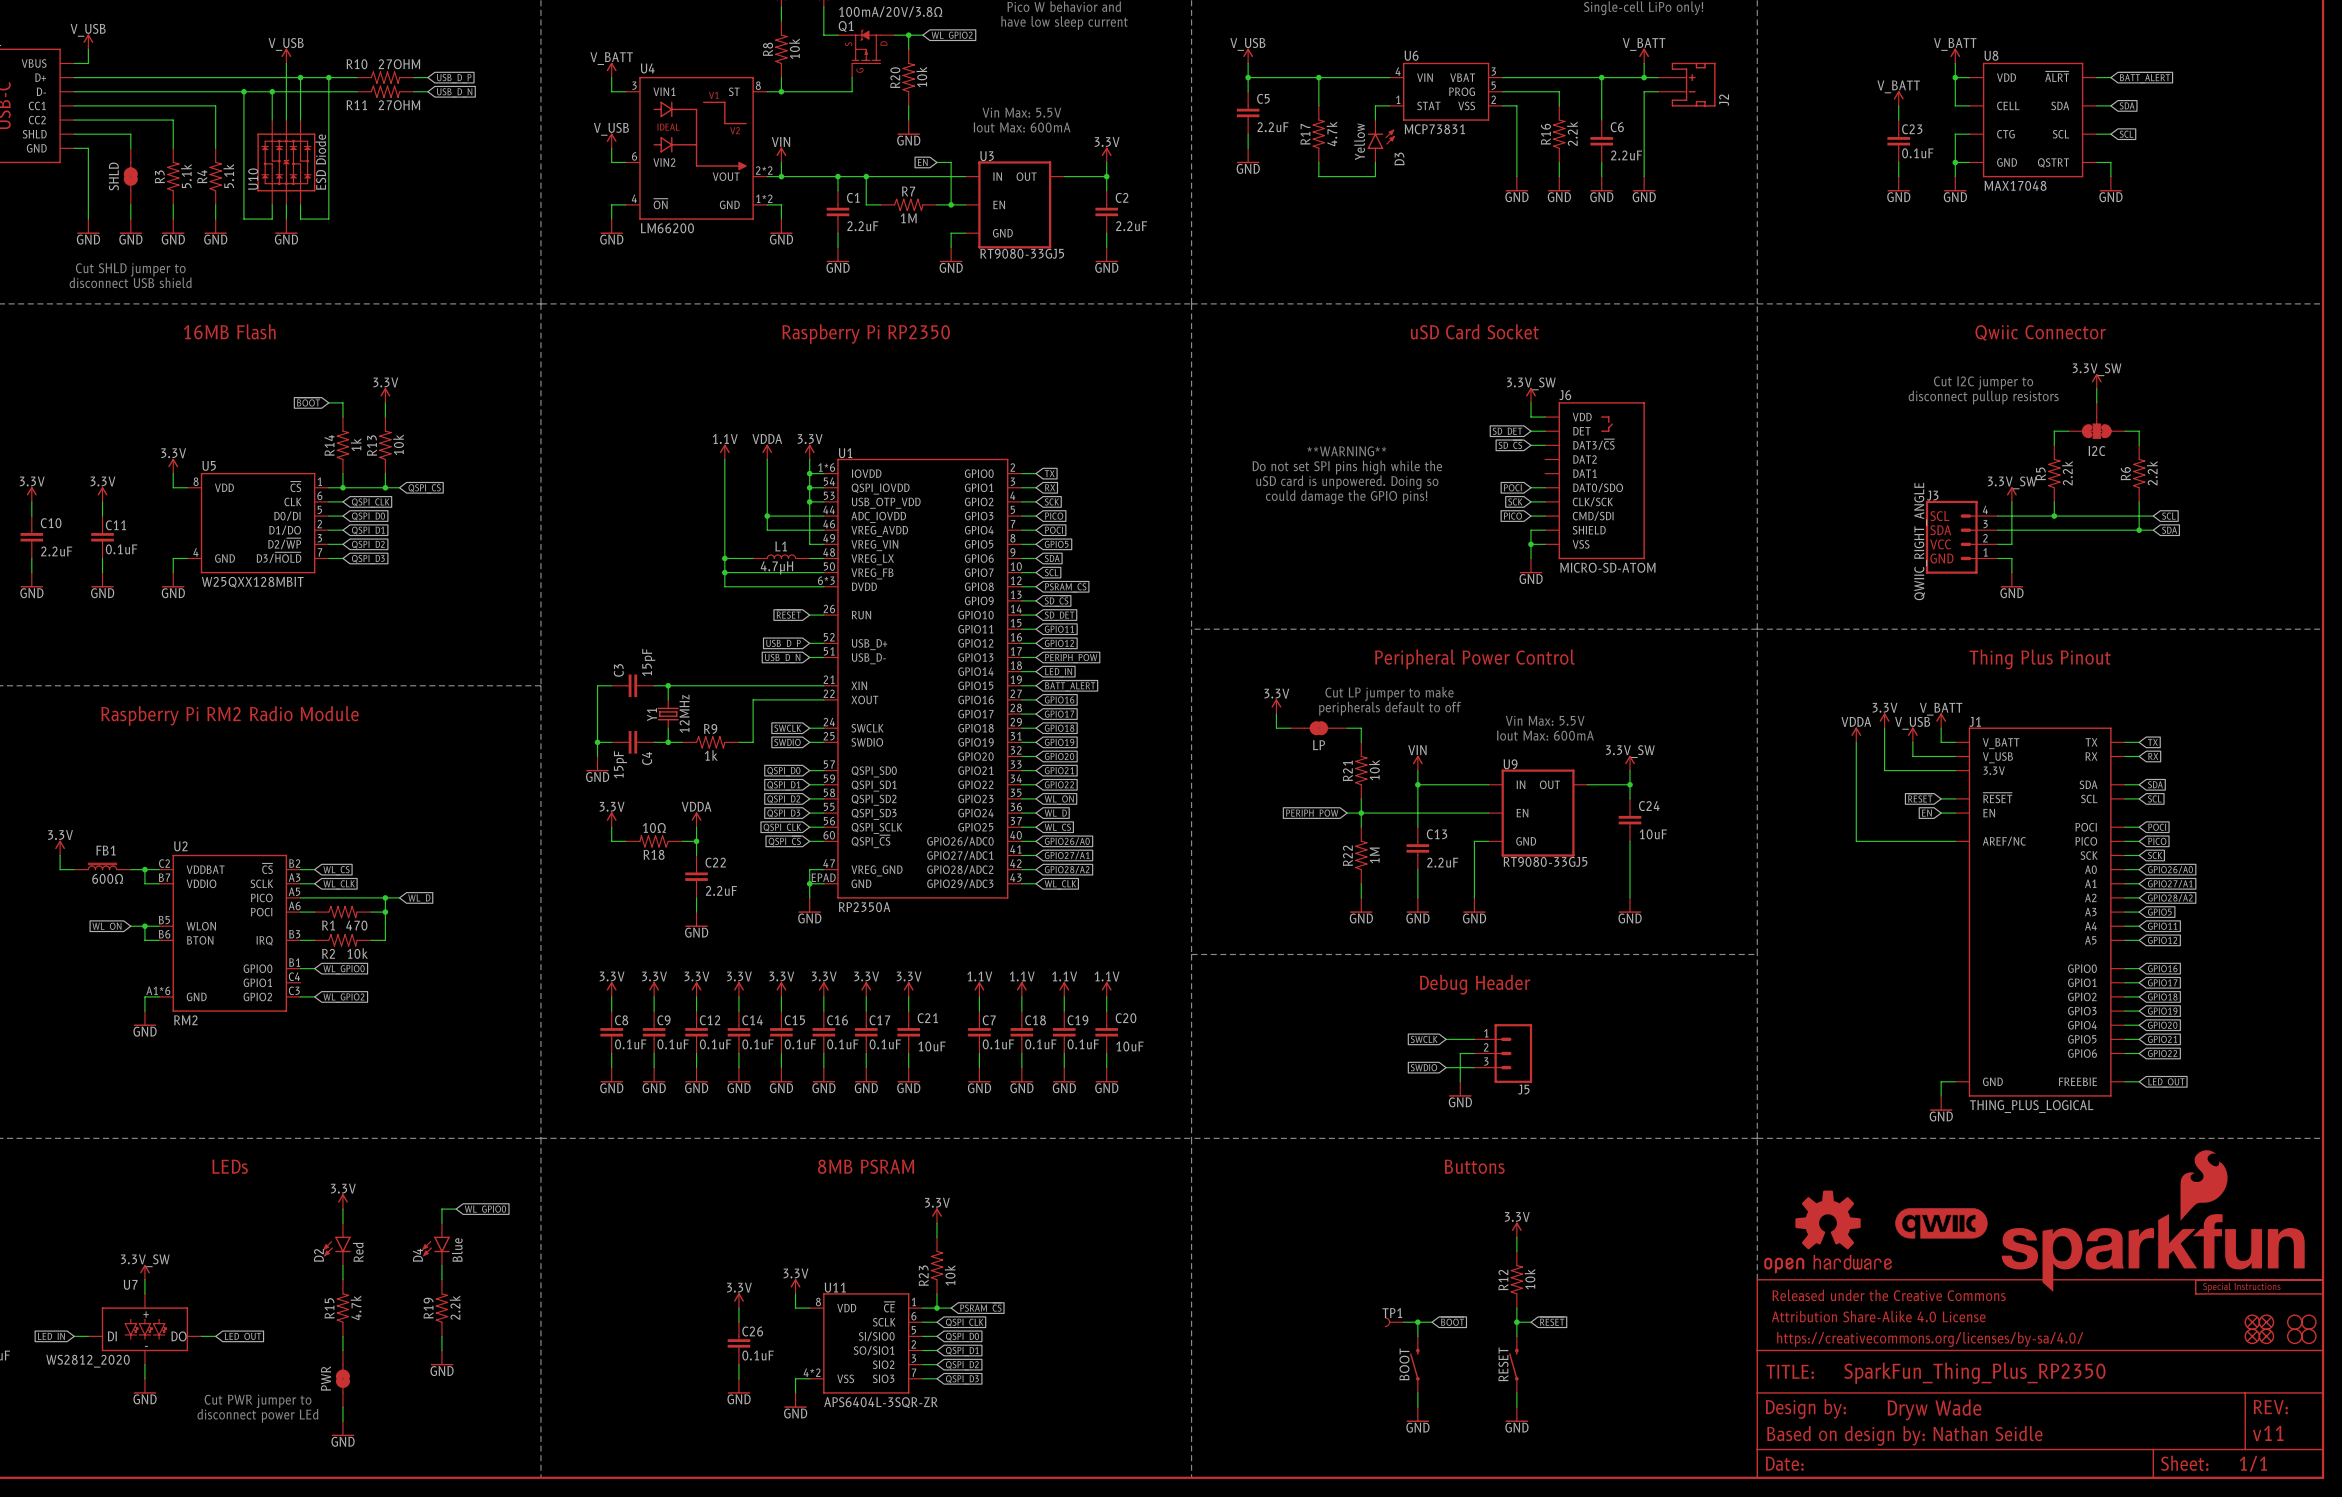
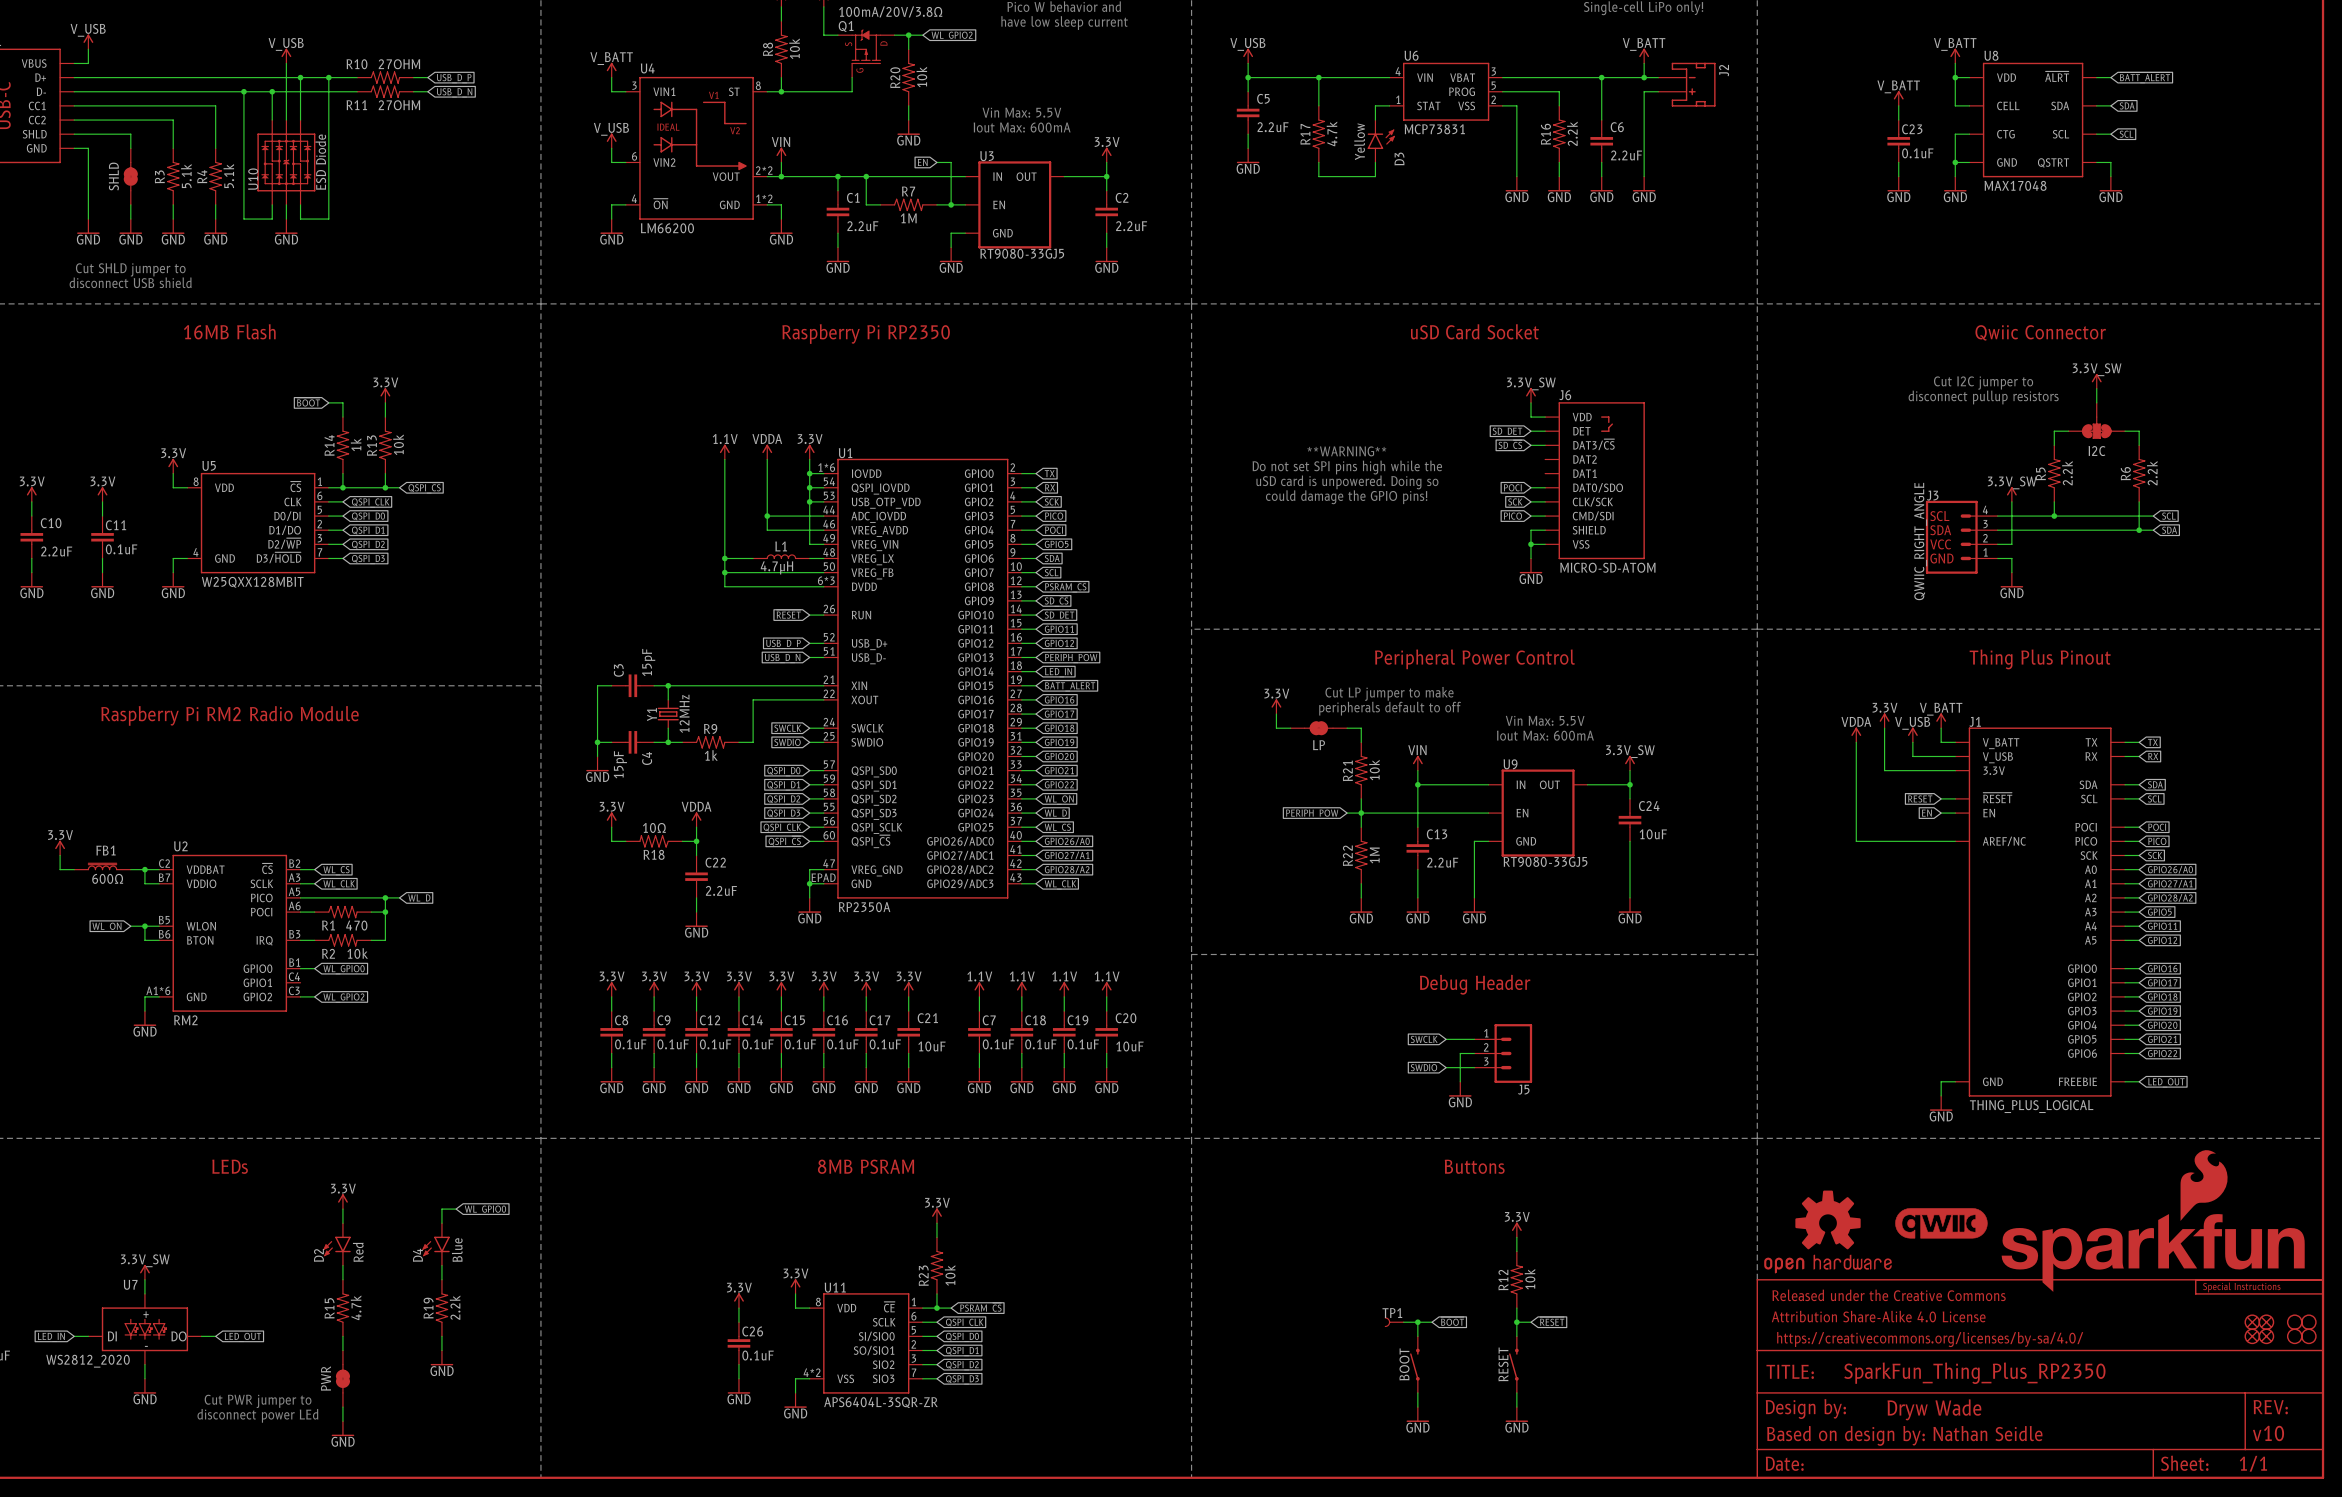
J2 flip: as is (1693, 84) -> up-down (1693, 84)
part text: v11 (2268, 1433) -> v10 (2268, 1433)

